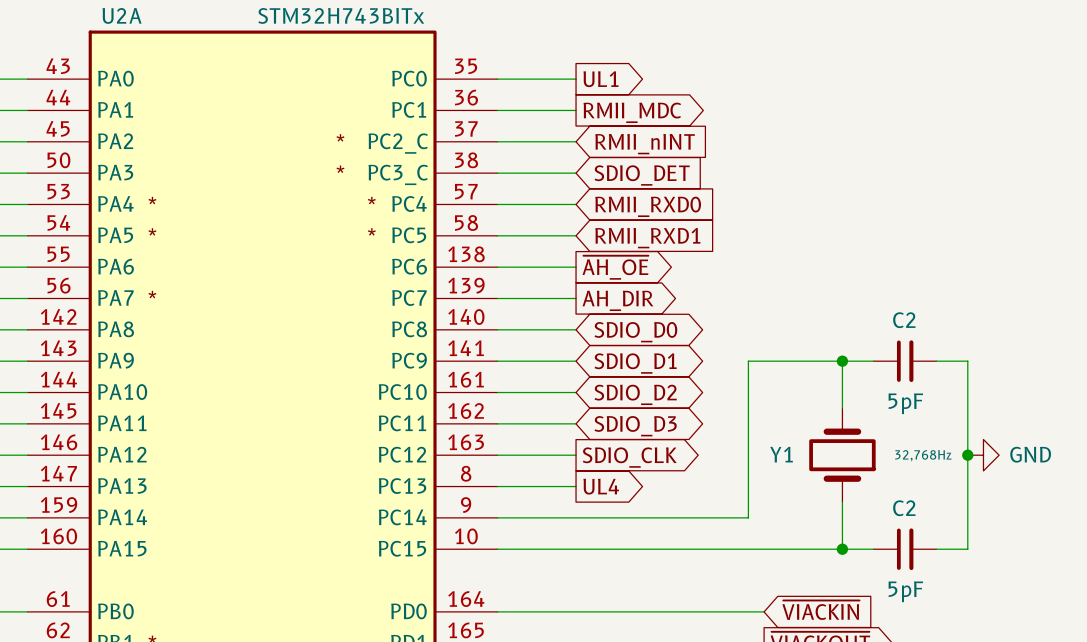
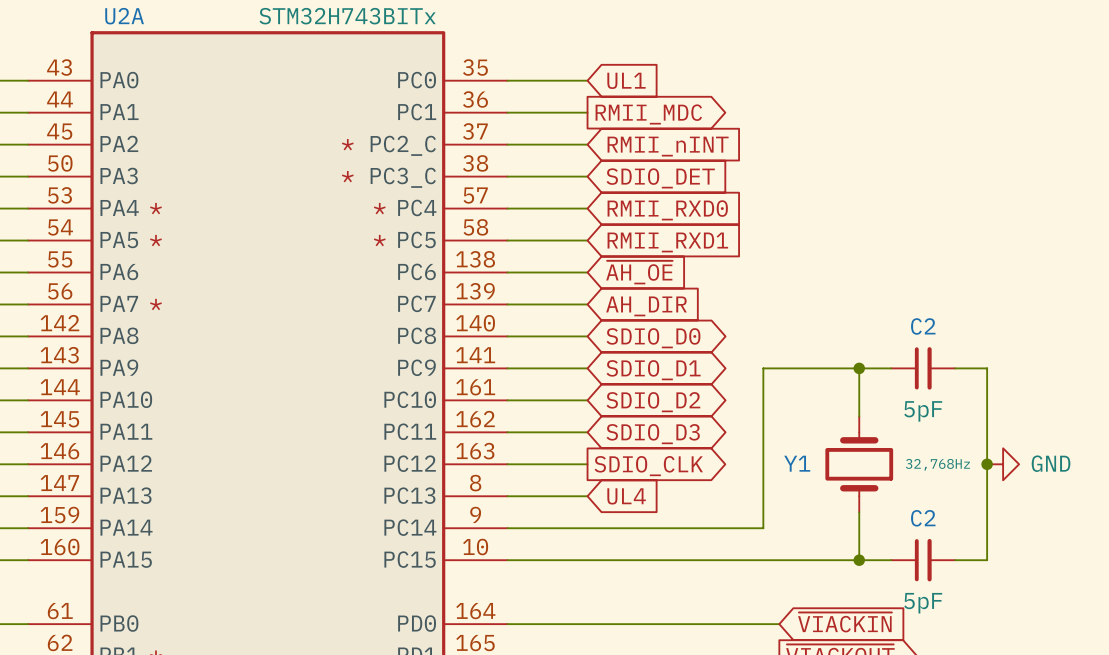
global label shape: output (600, 79) -> input (626, 80)
global label shape: output (615, 267) -> input (639, 272)
global label shape: output (617, 300) -> input (646, 306)
global label shape: output (601, 486) -> input (626, 496)

